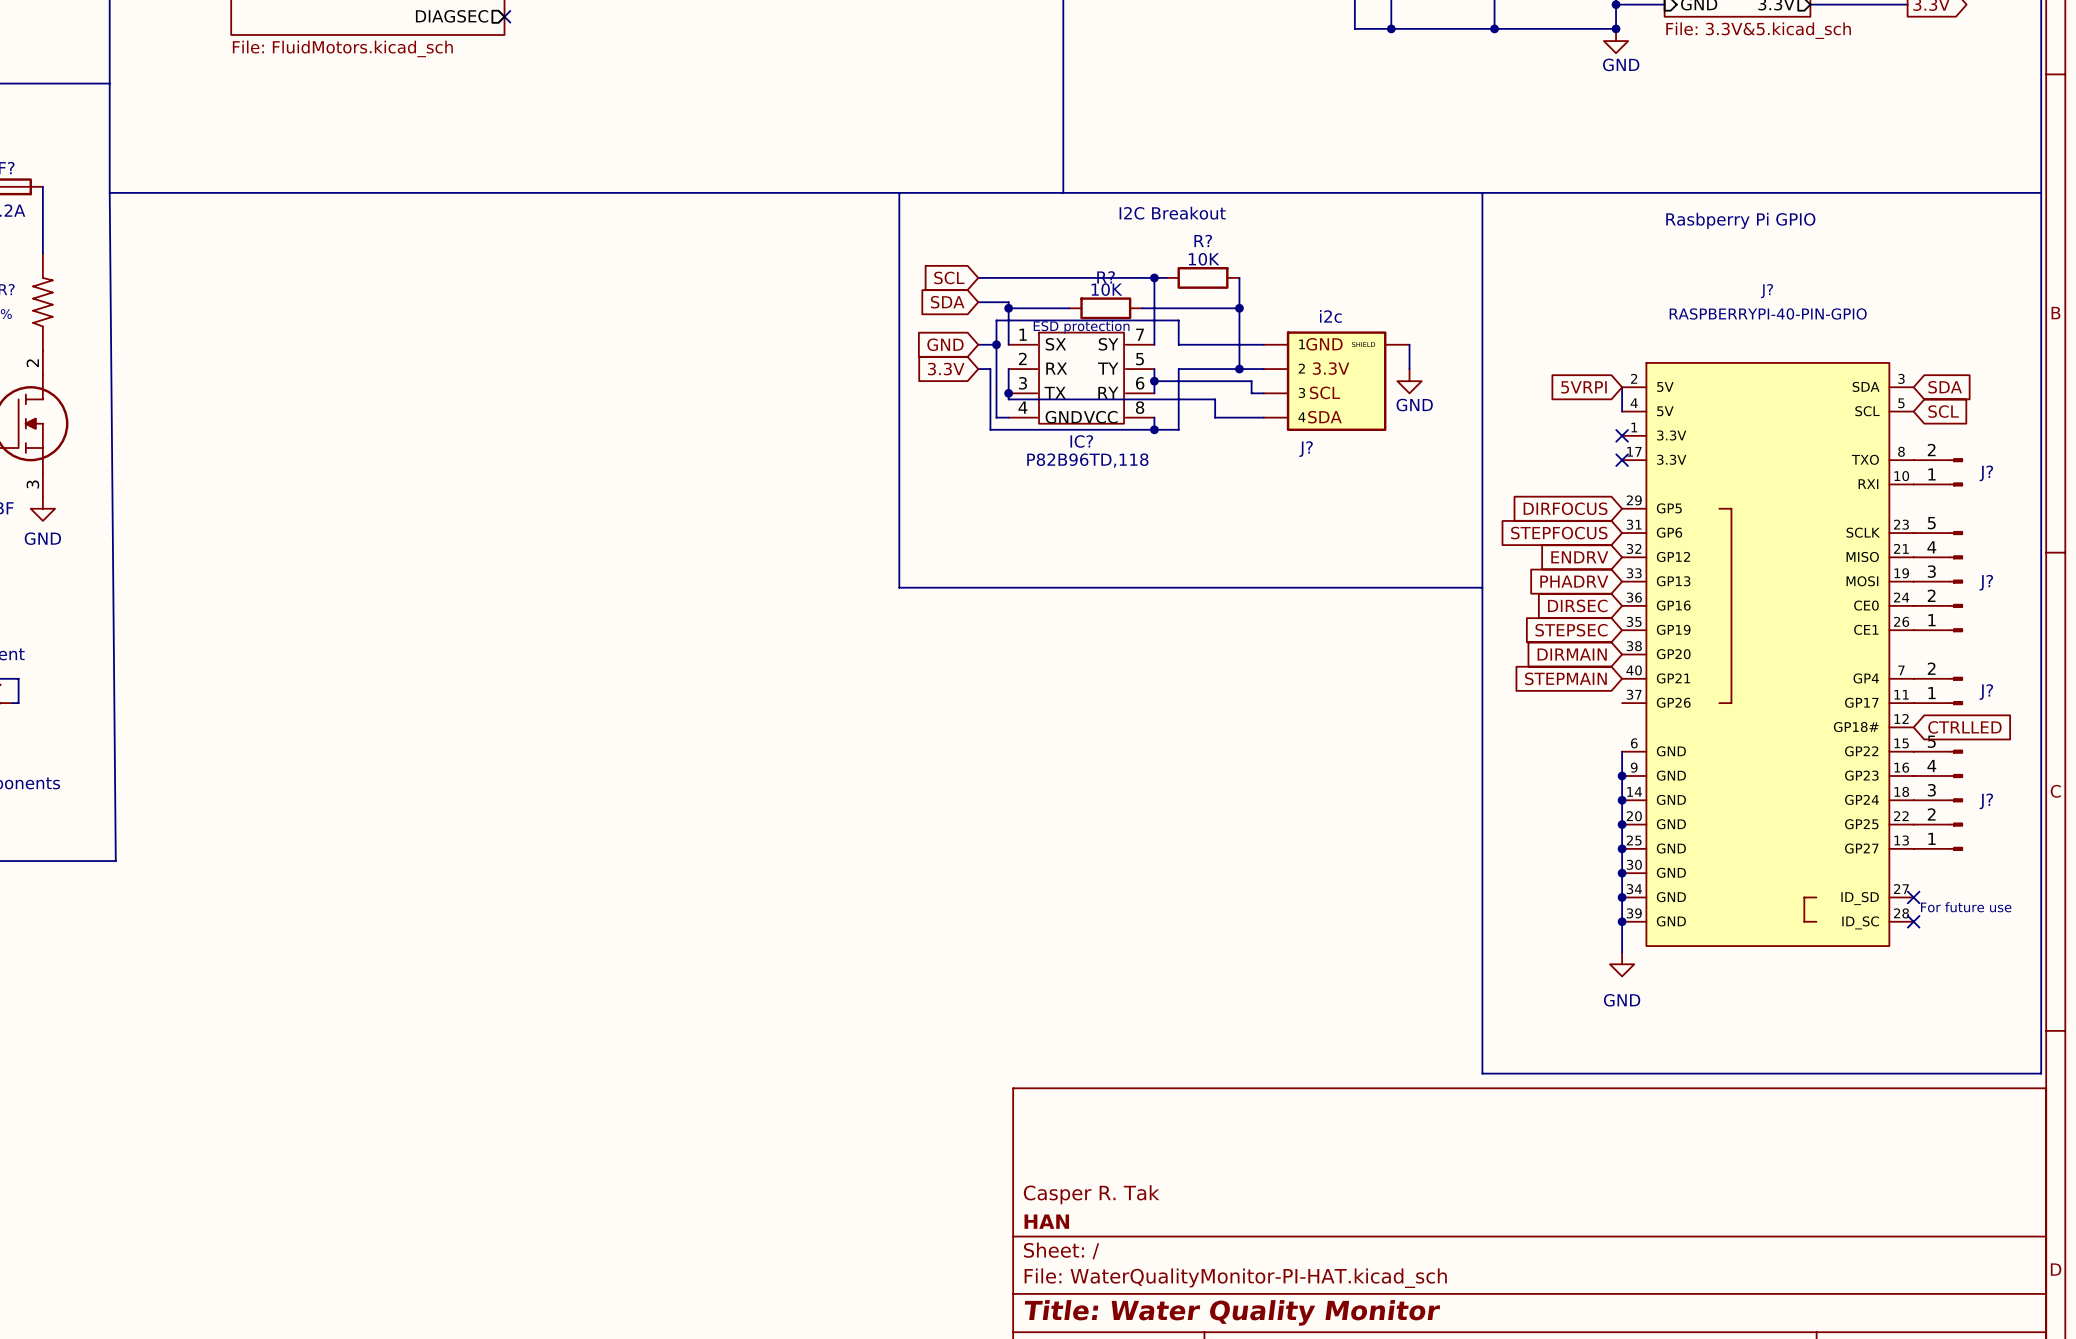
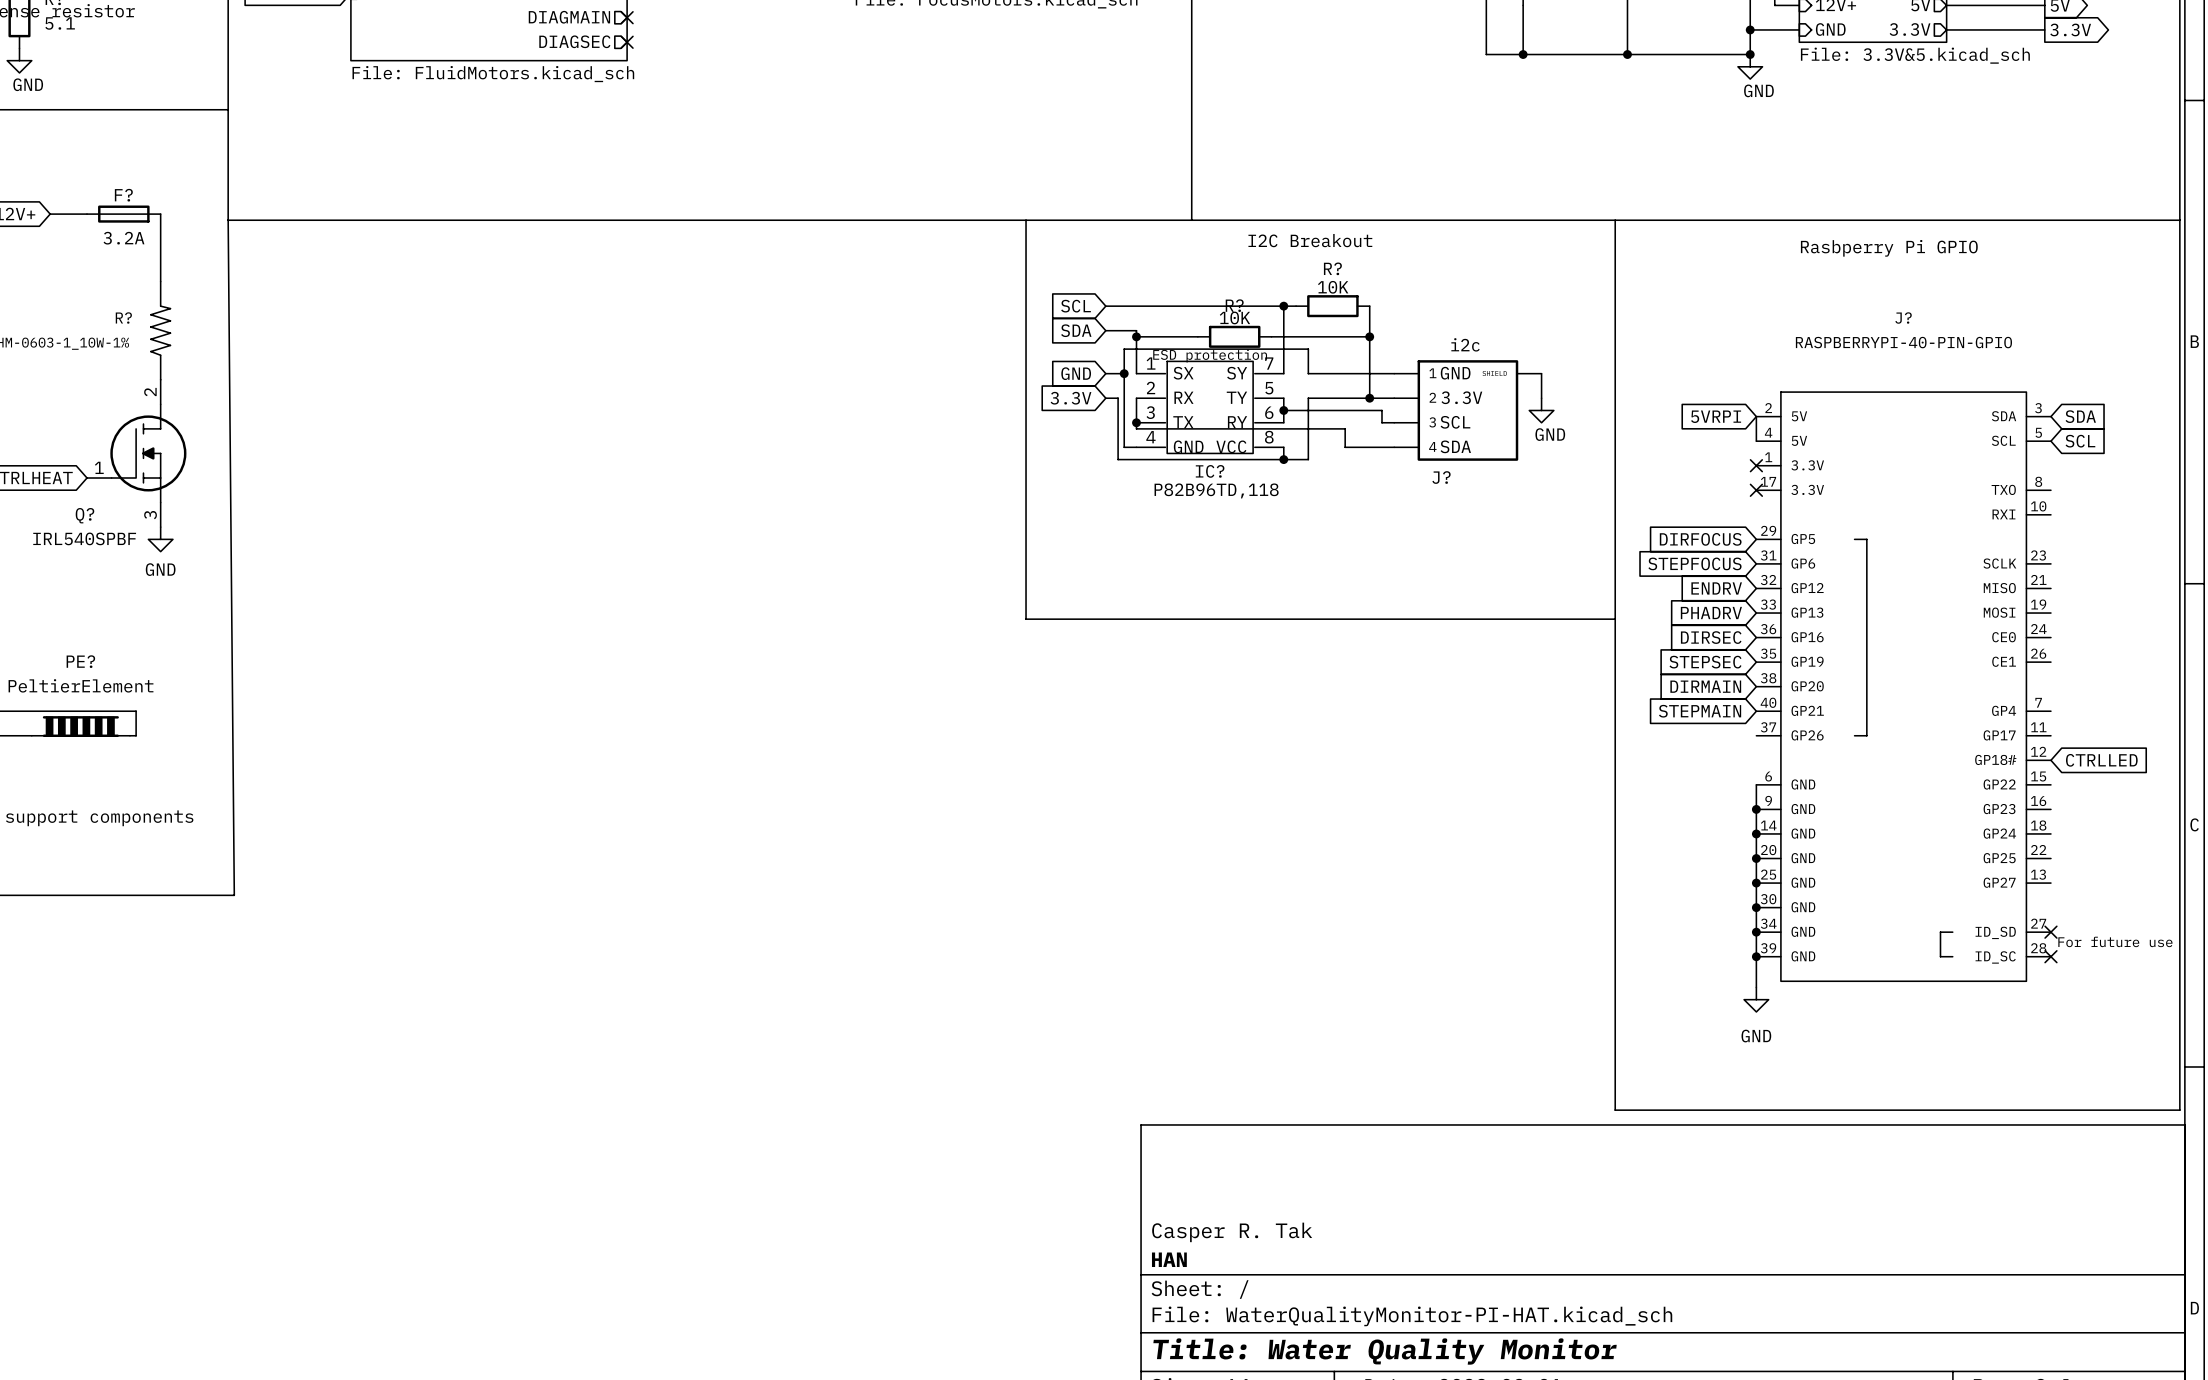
J?: (1938, 472) -> none
J?: (1938, 581) -> none
J?: (1938, 690) -> none
J?: (1938, 800) -> none

